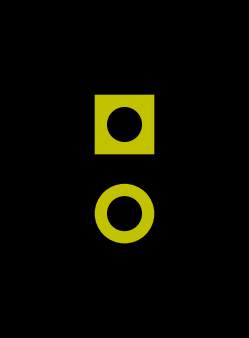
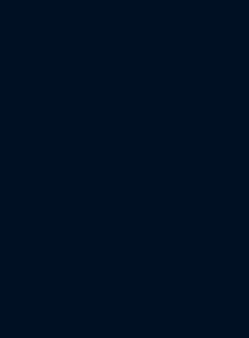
part: (124, 169) -> none

